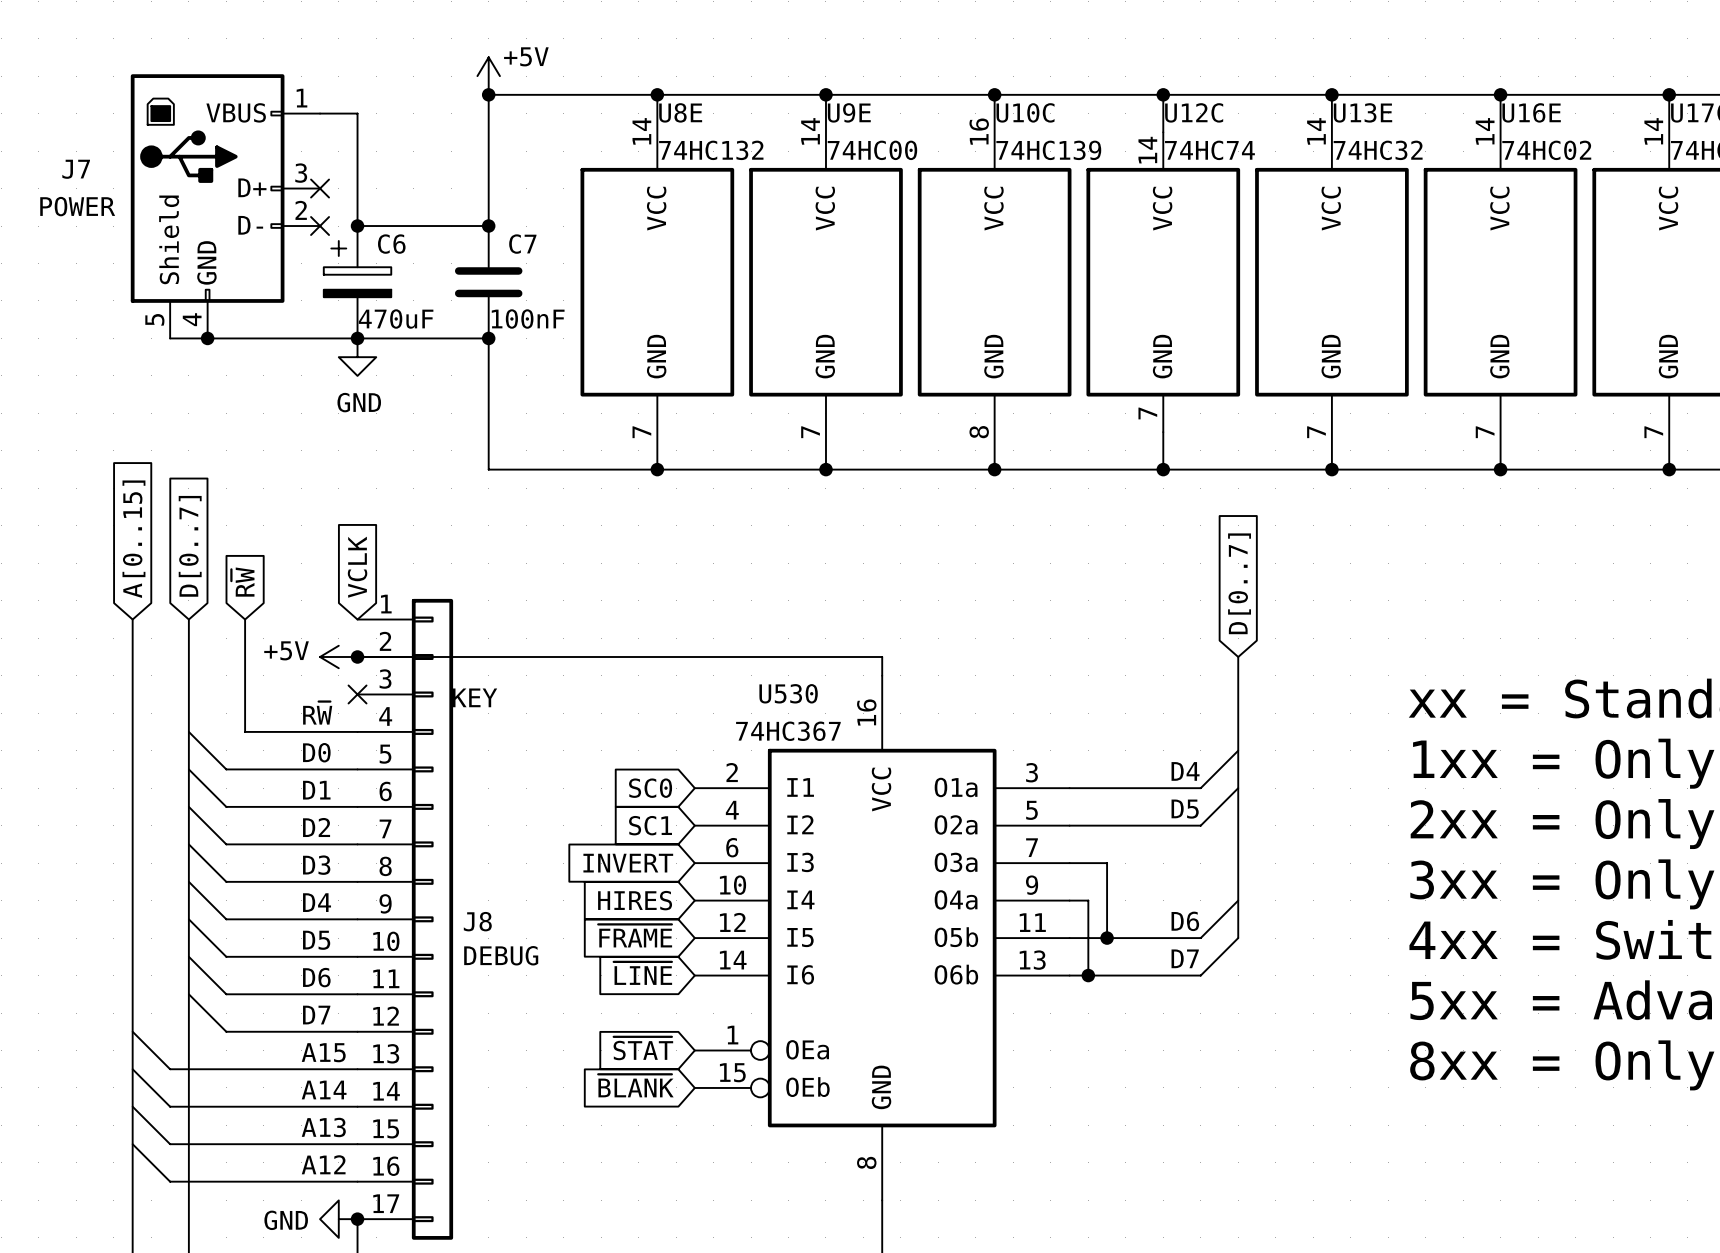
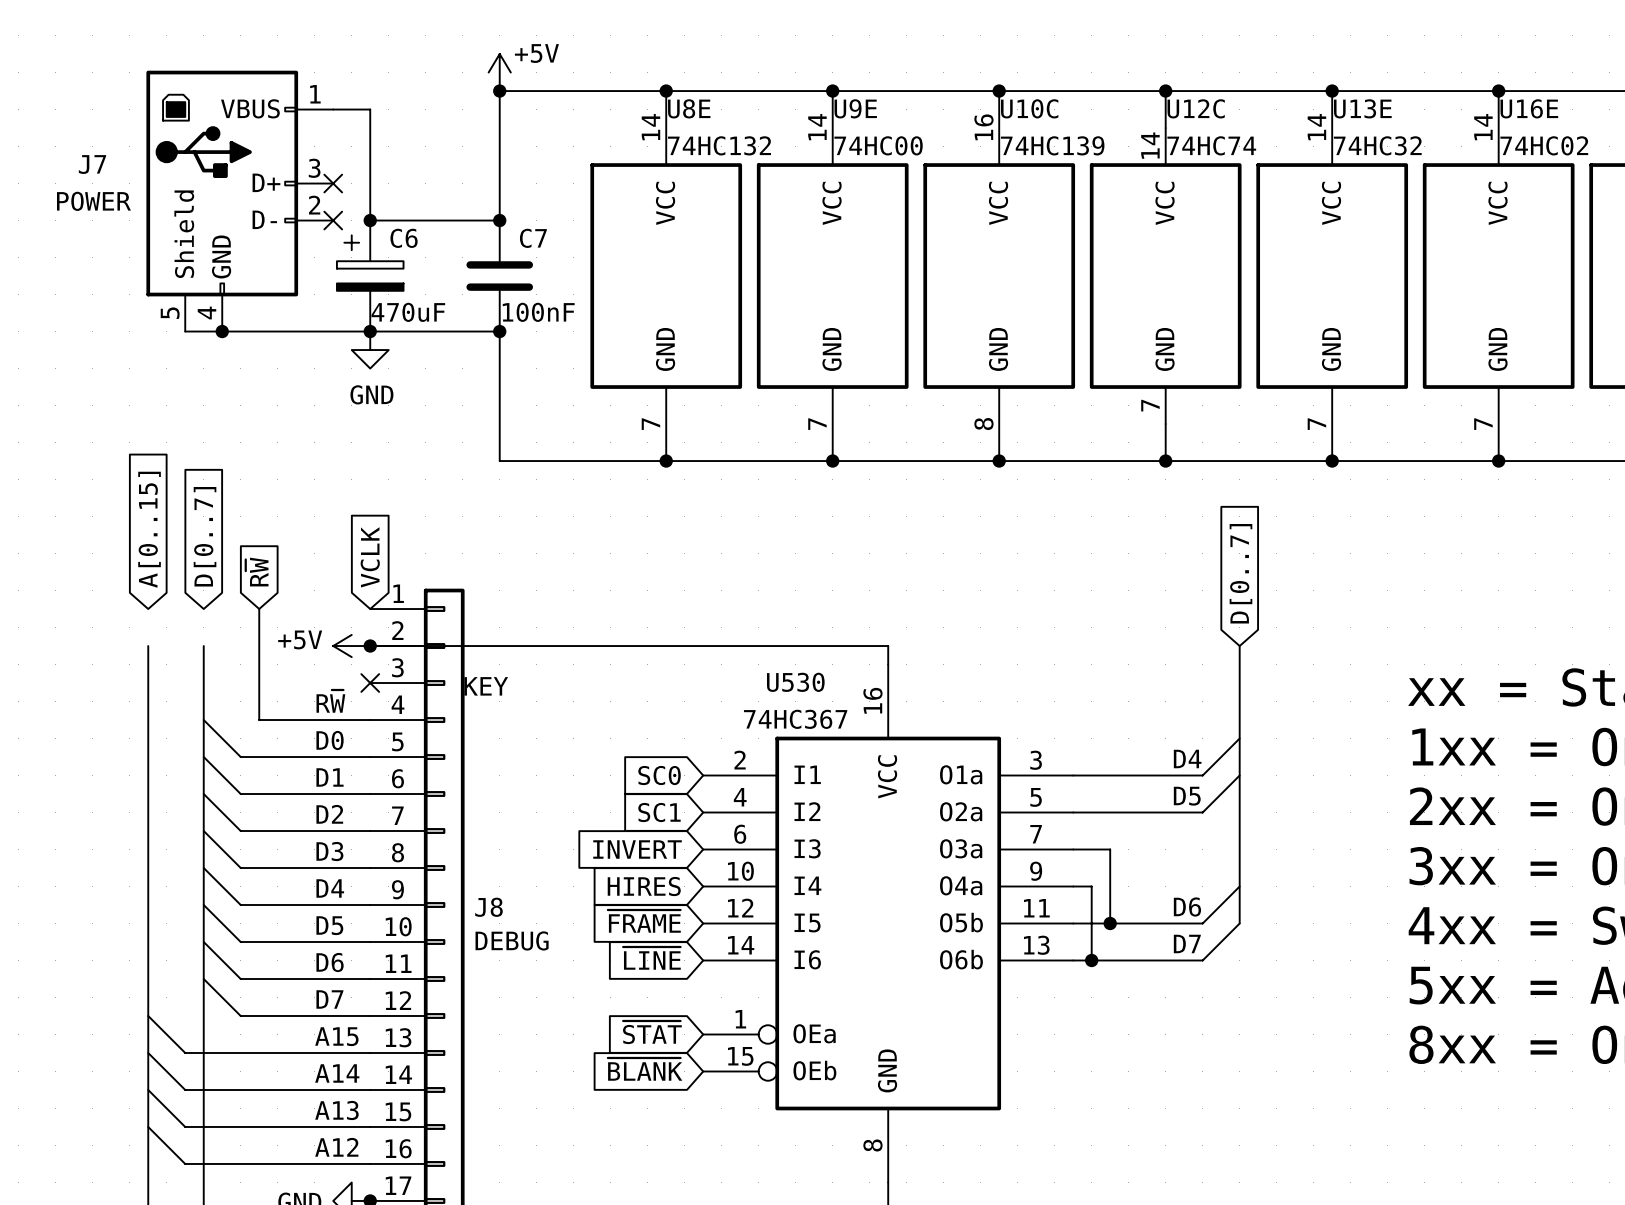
bus: (132, 619) (132, 656) -> none
bus: (188, 619) (188, 656) -> none

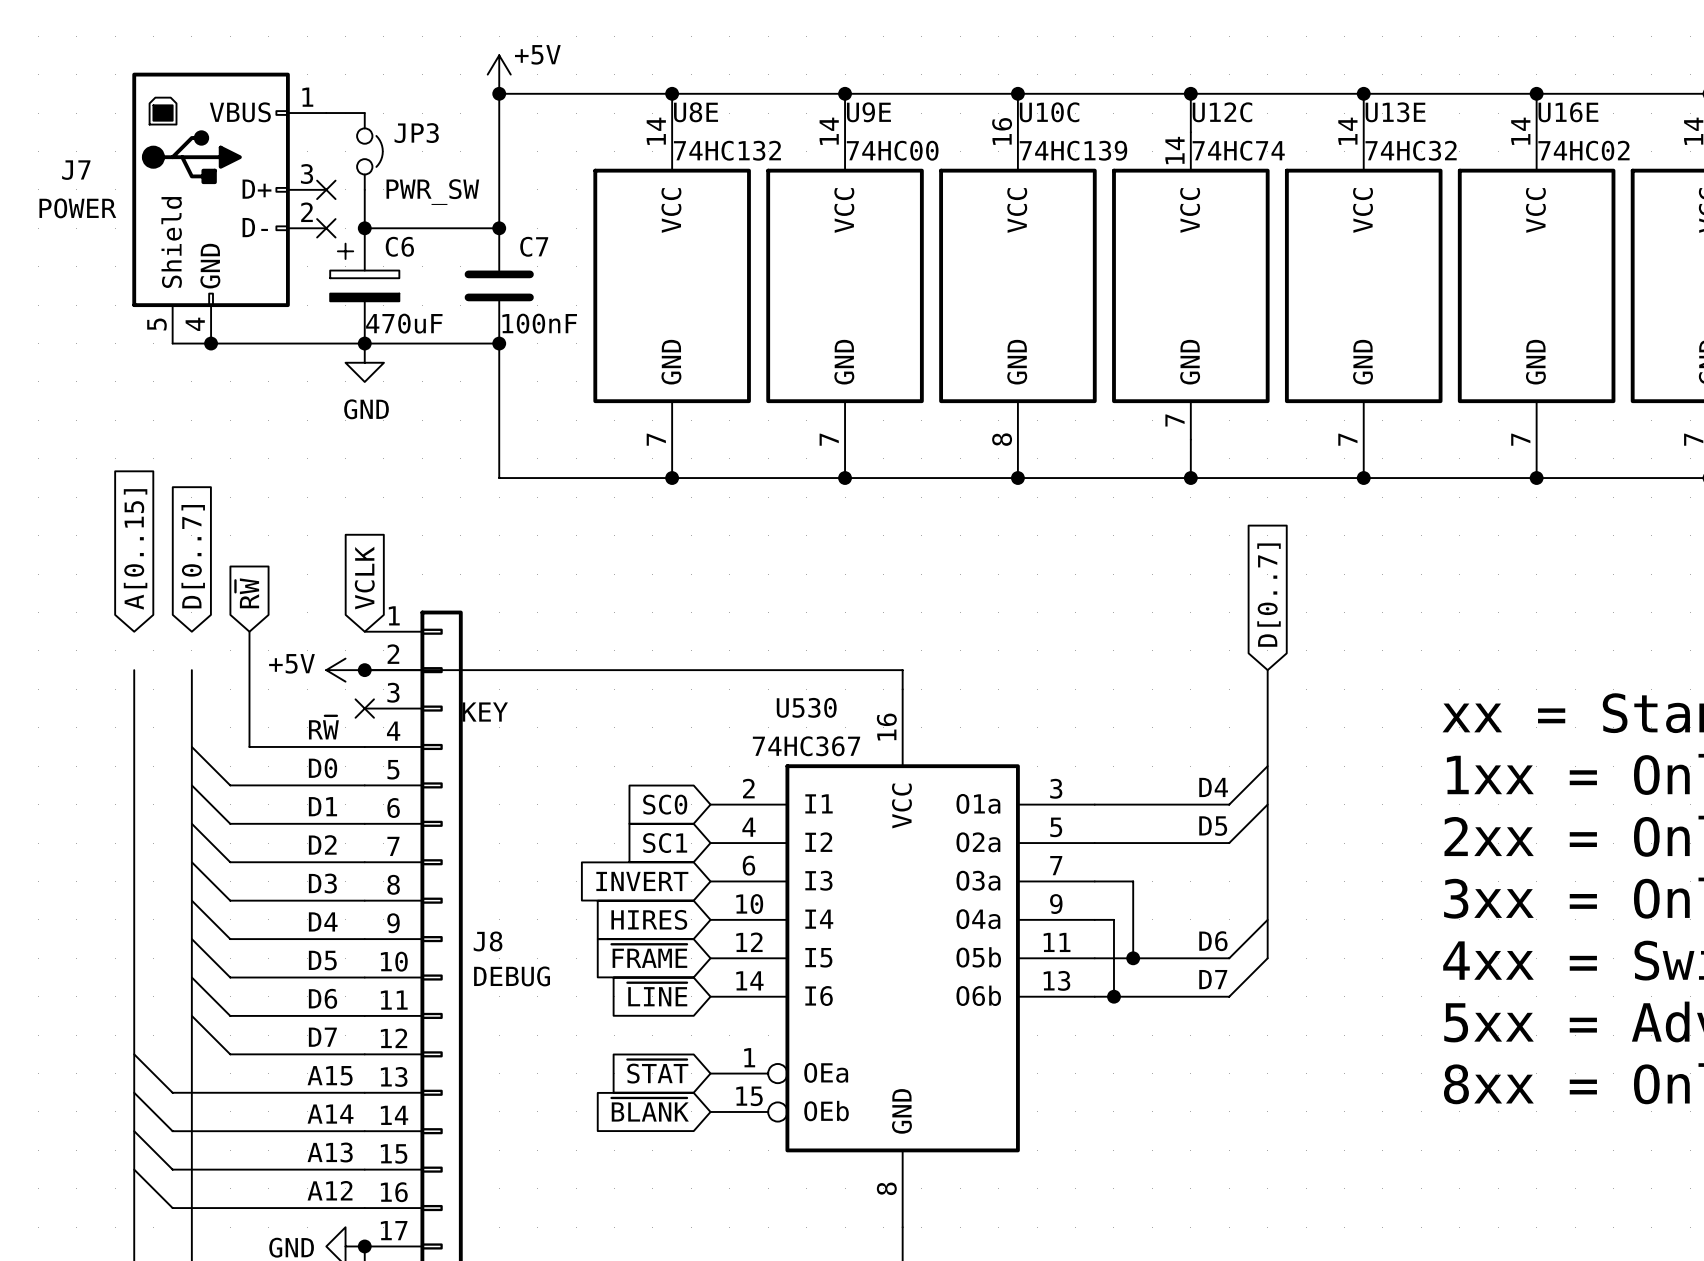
wire: (370, 109) (370, 183) -> none
JP3: none -> PWR_SW (369, 151)

